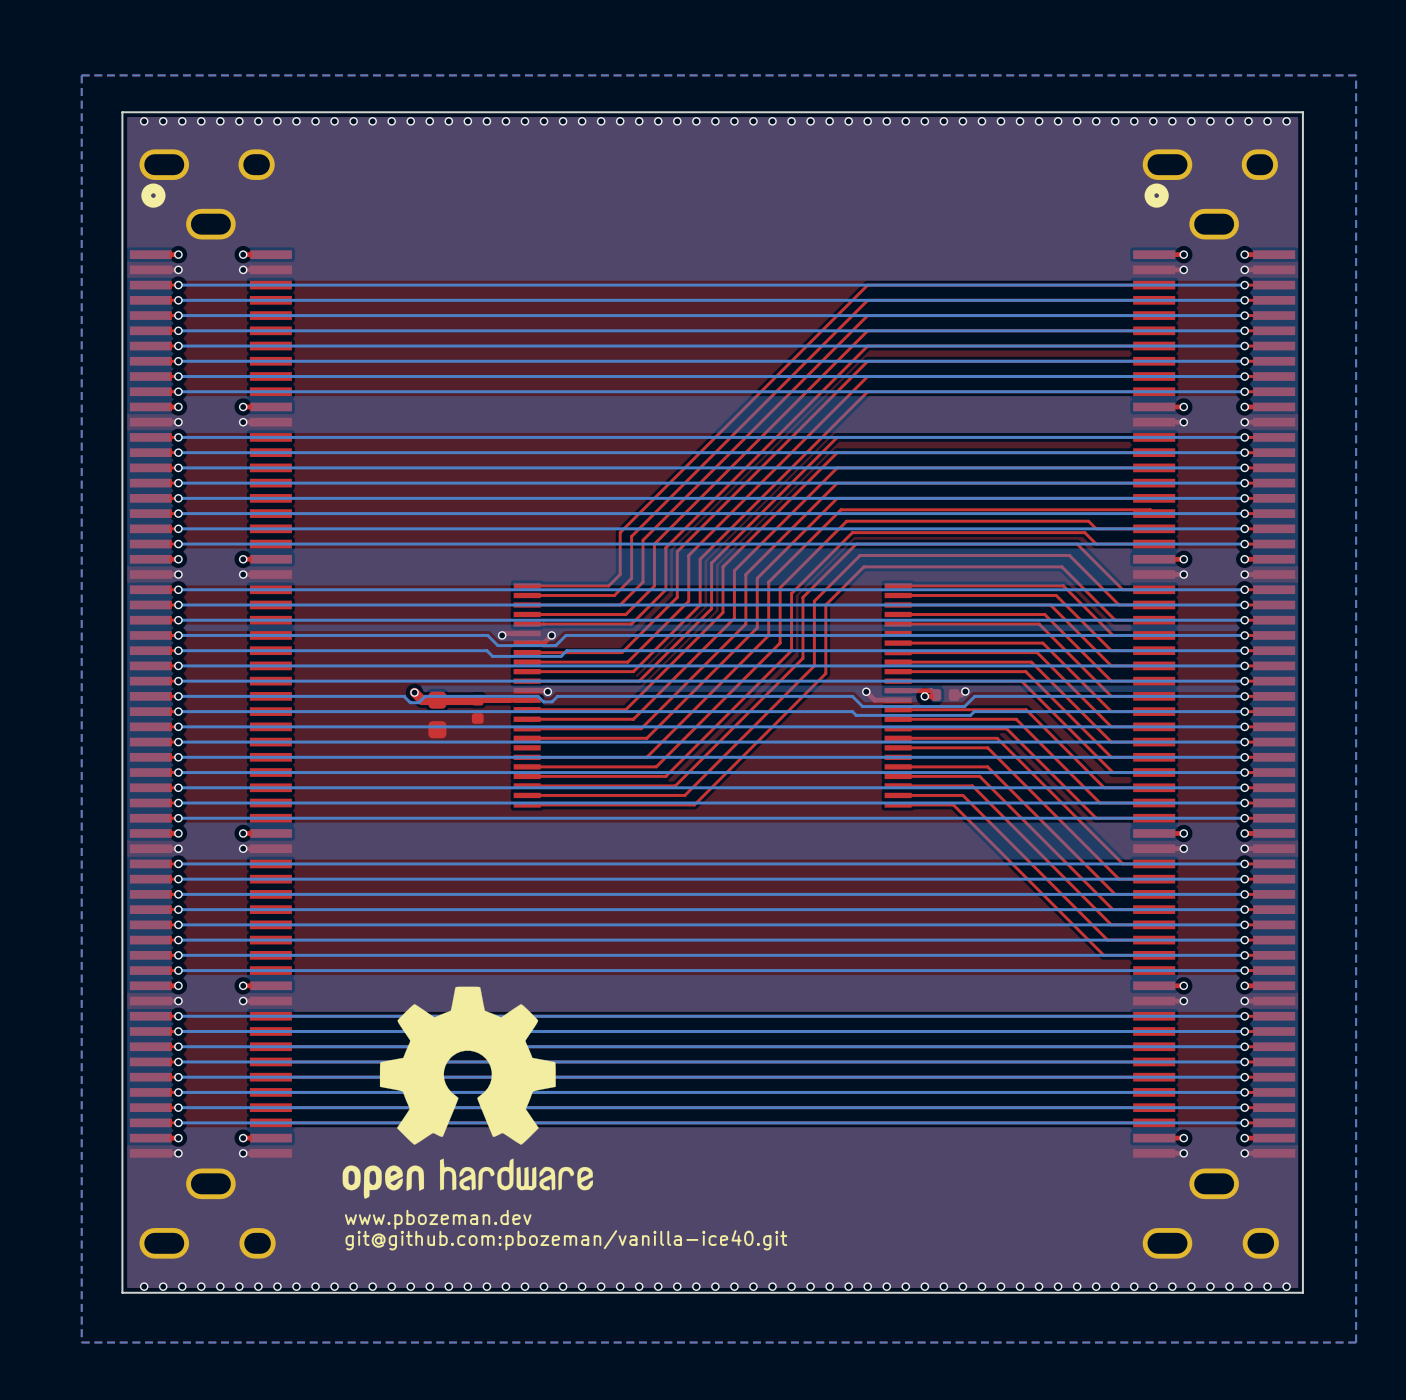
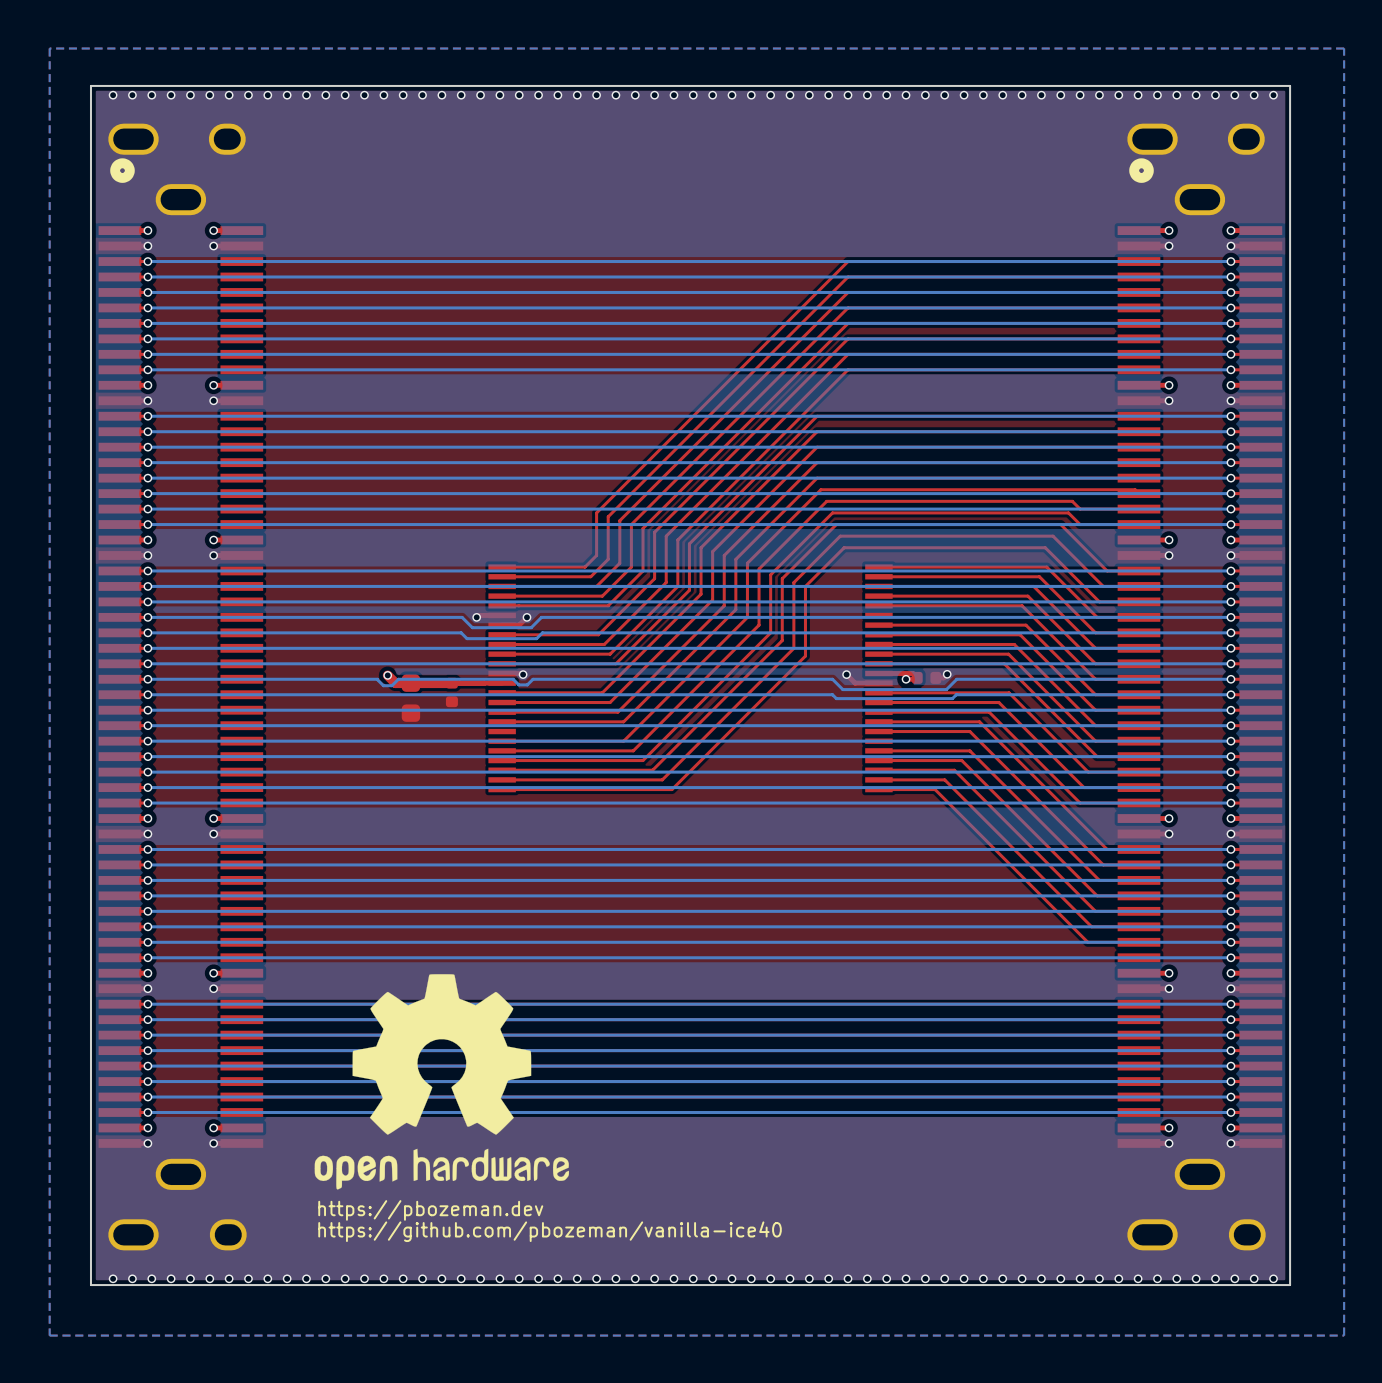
text: www.pbozeman.dev (438, 1219) -> https://pbozeman.dev (430, 1210)
text: git@github.com:pbozeman/vanilla-ice40.git (566, 1240) -> https://github.com/pbozeman/vanilla-ice40 (550, 1231)

